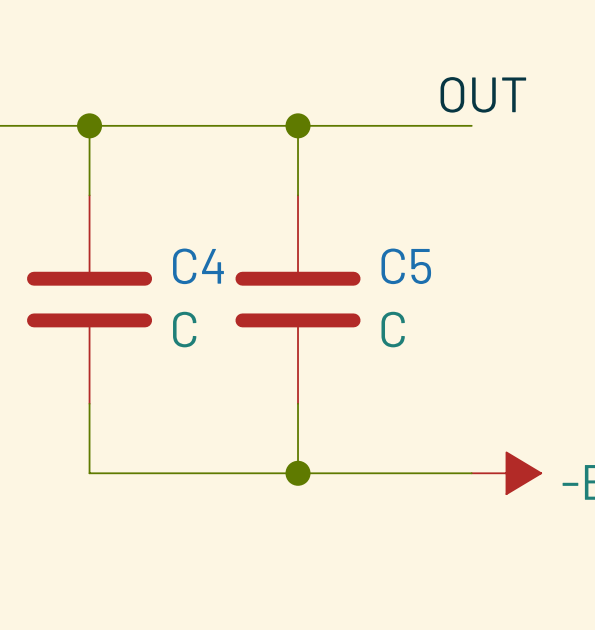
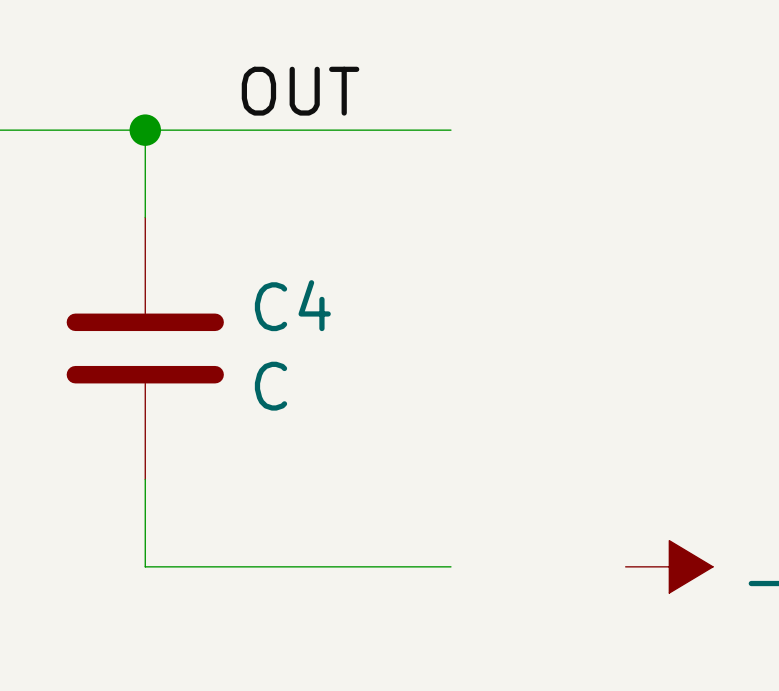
label position: OUT (483, 94) -> OUT (300, 91)
wire: (298, 125) (298, 195) -> none
junction: (298, 125) -> none
wire: (332, 125) (471, 125) -> none
C5: C (298, 299) -> none
wire: (298, 403) (298, 473) -> none
junction: (298, 473) -> none
wire: (332, 473) (471, 473) -> none

